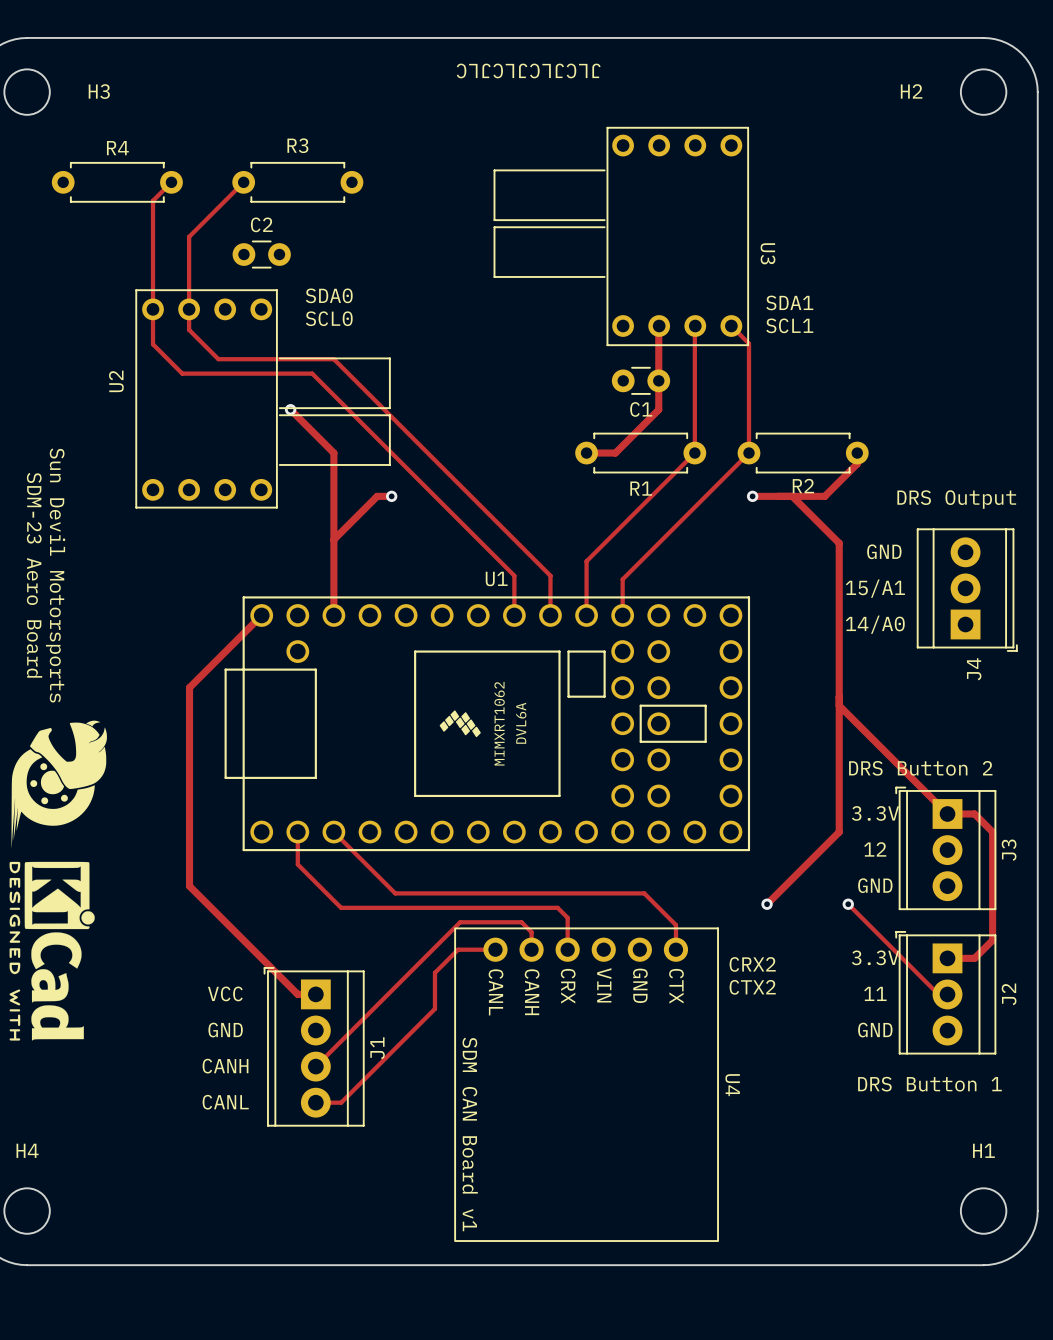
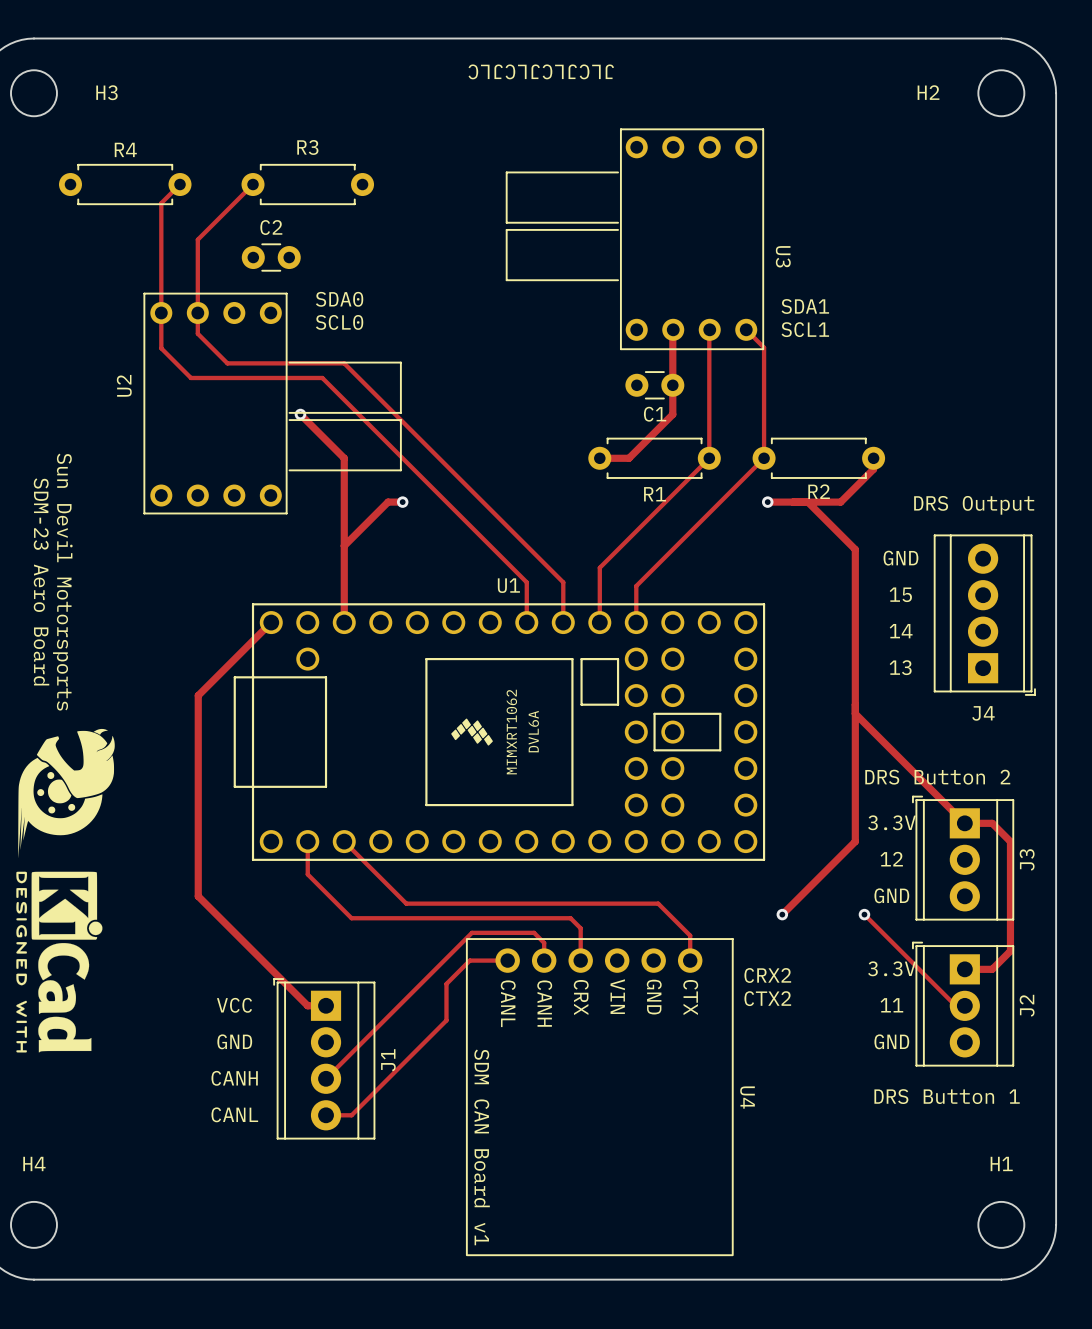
J4 footprint: [916, 528, 1018, 652] -> [933, 534, 1036, 696]
text: 15/A1 (875, 588) -> 15 (900, 594)
text: 14/A0 (875, 624) -> 14 (901, 631)
text: none -> 13 (900, 667)

